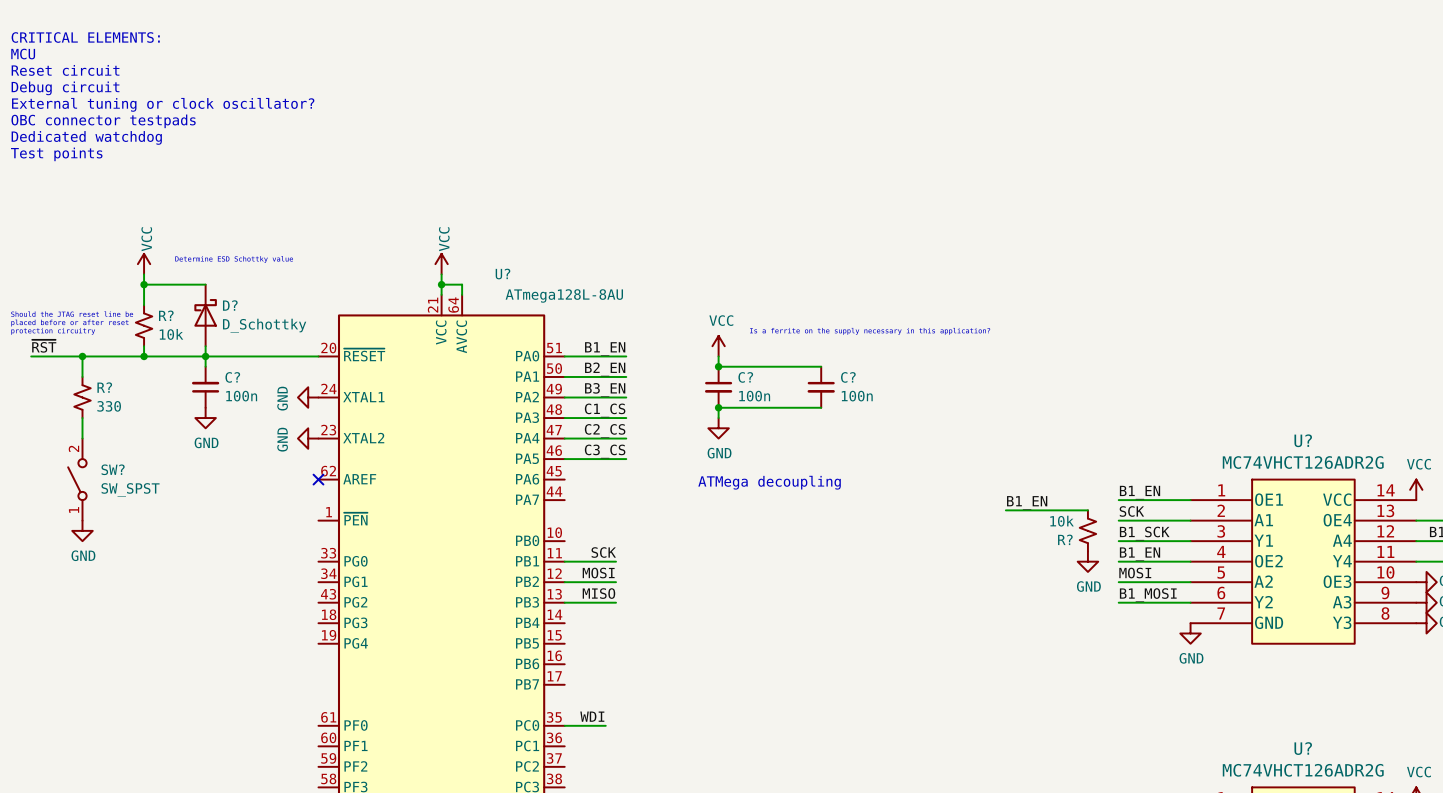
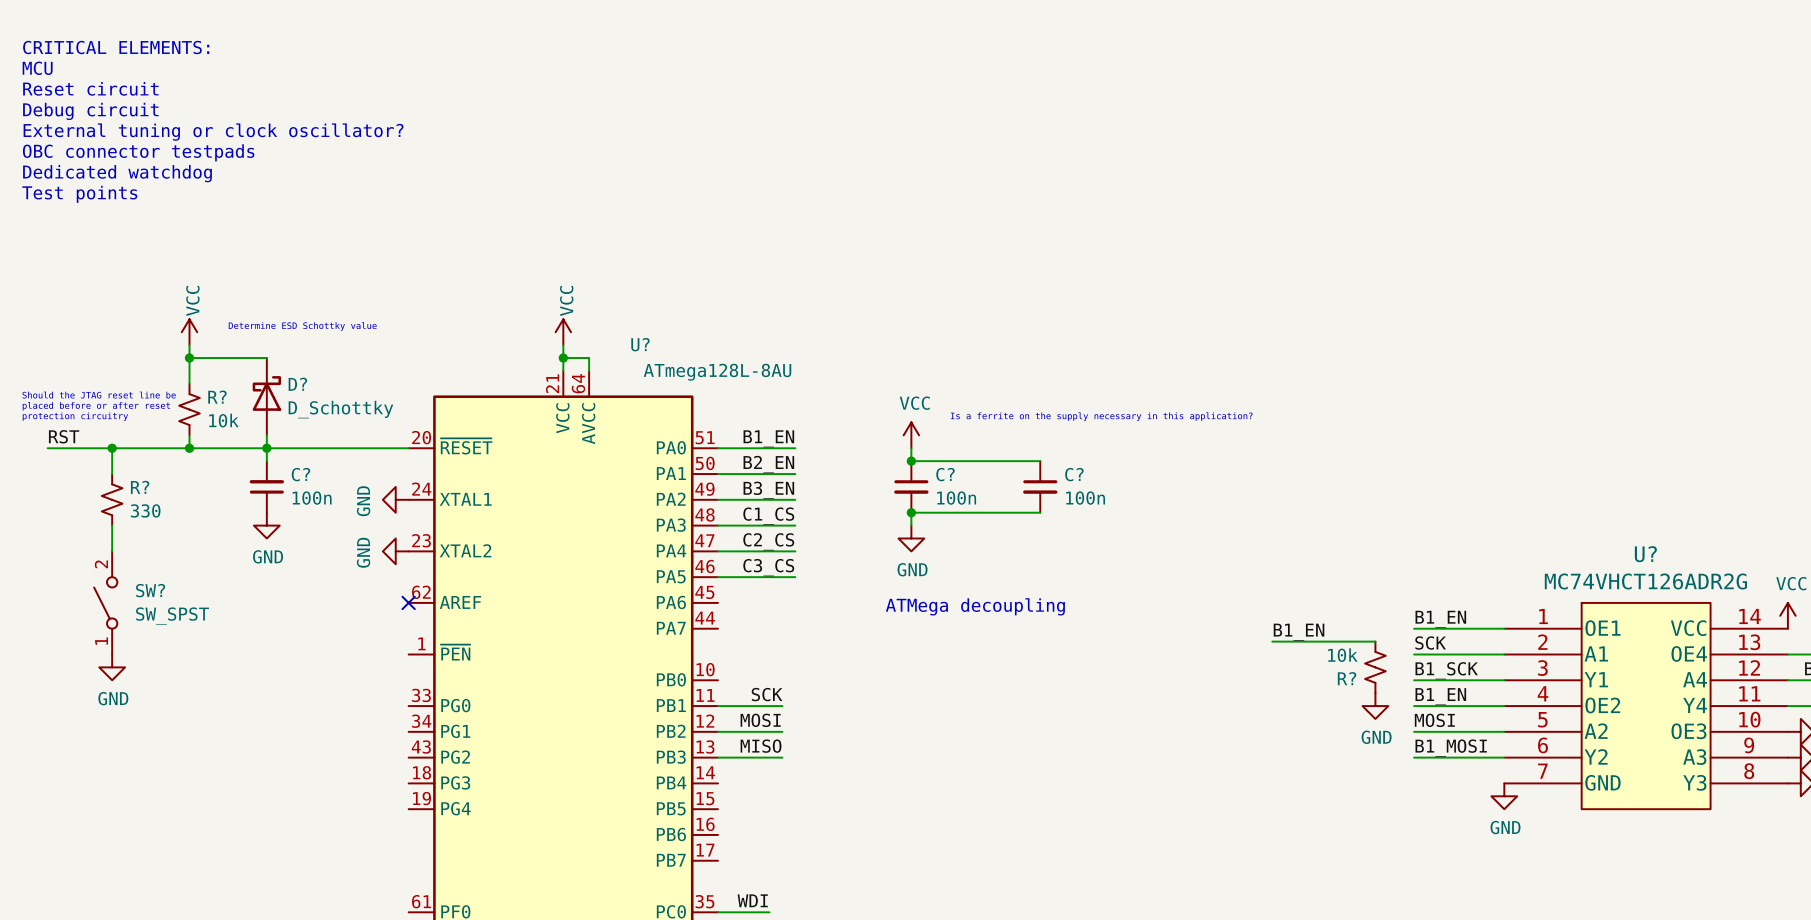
label: ~{RST} (44, 346) -> RST (64, 436)

